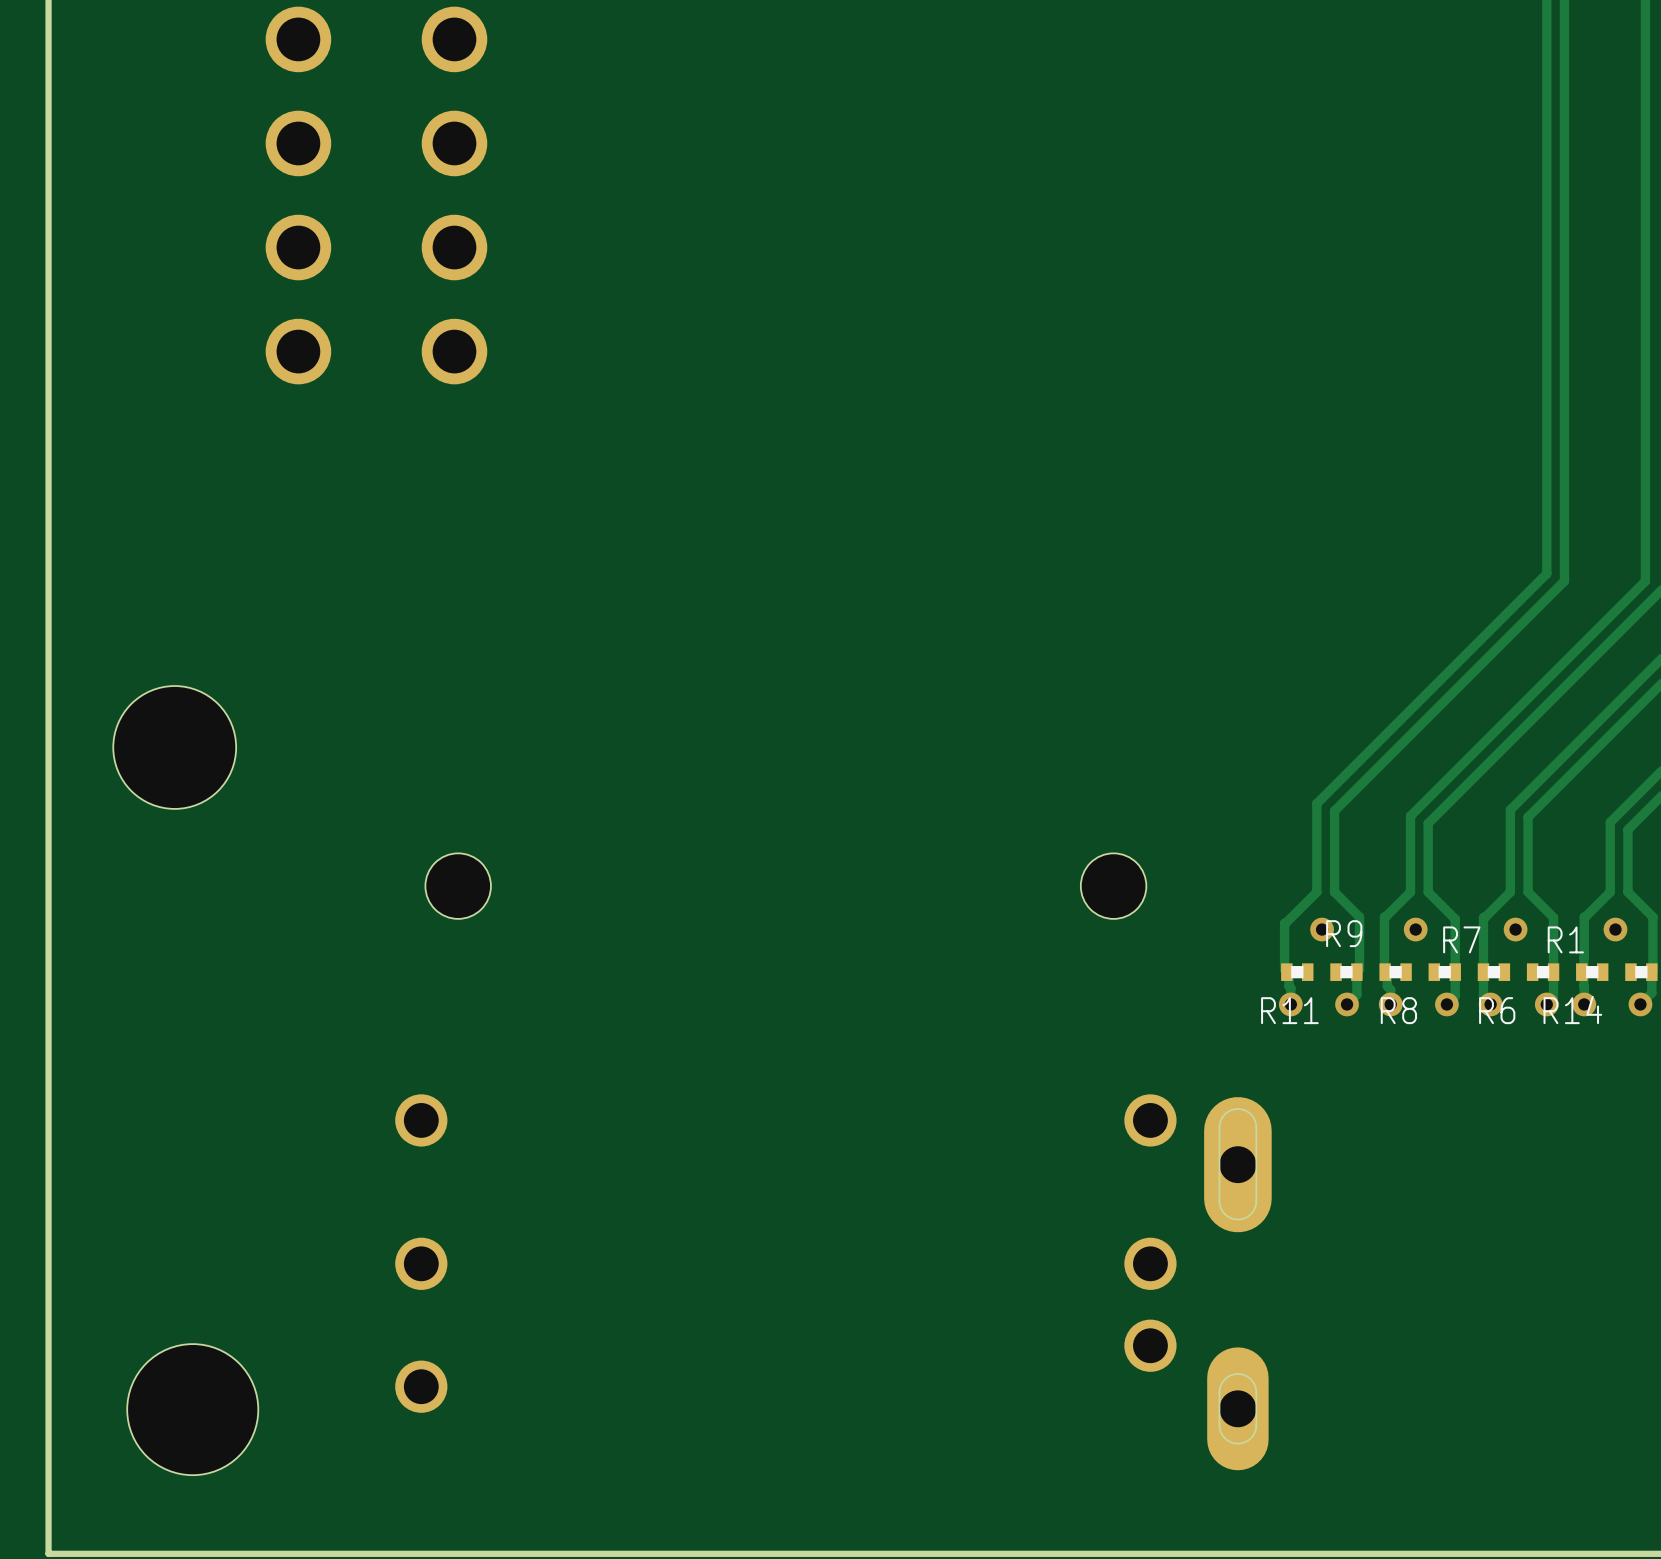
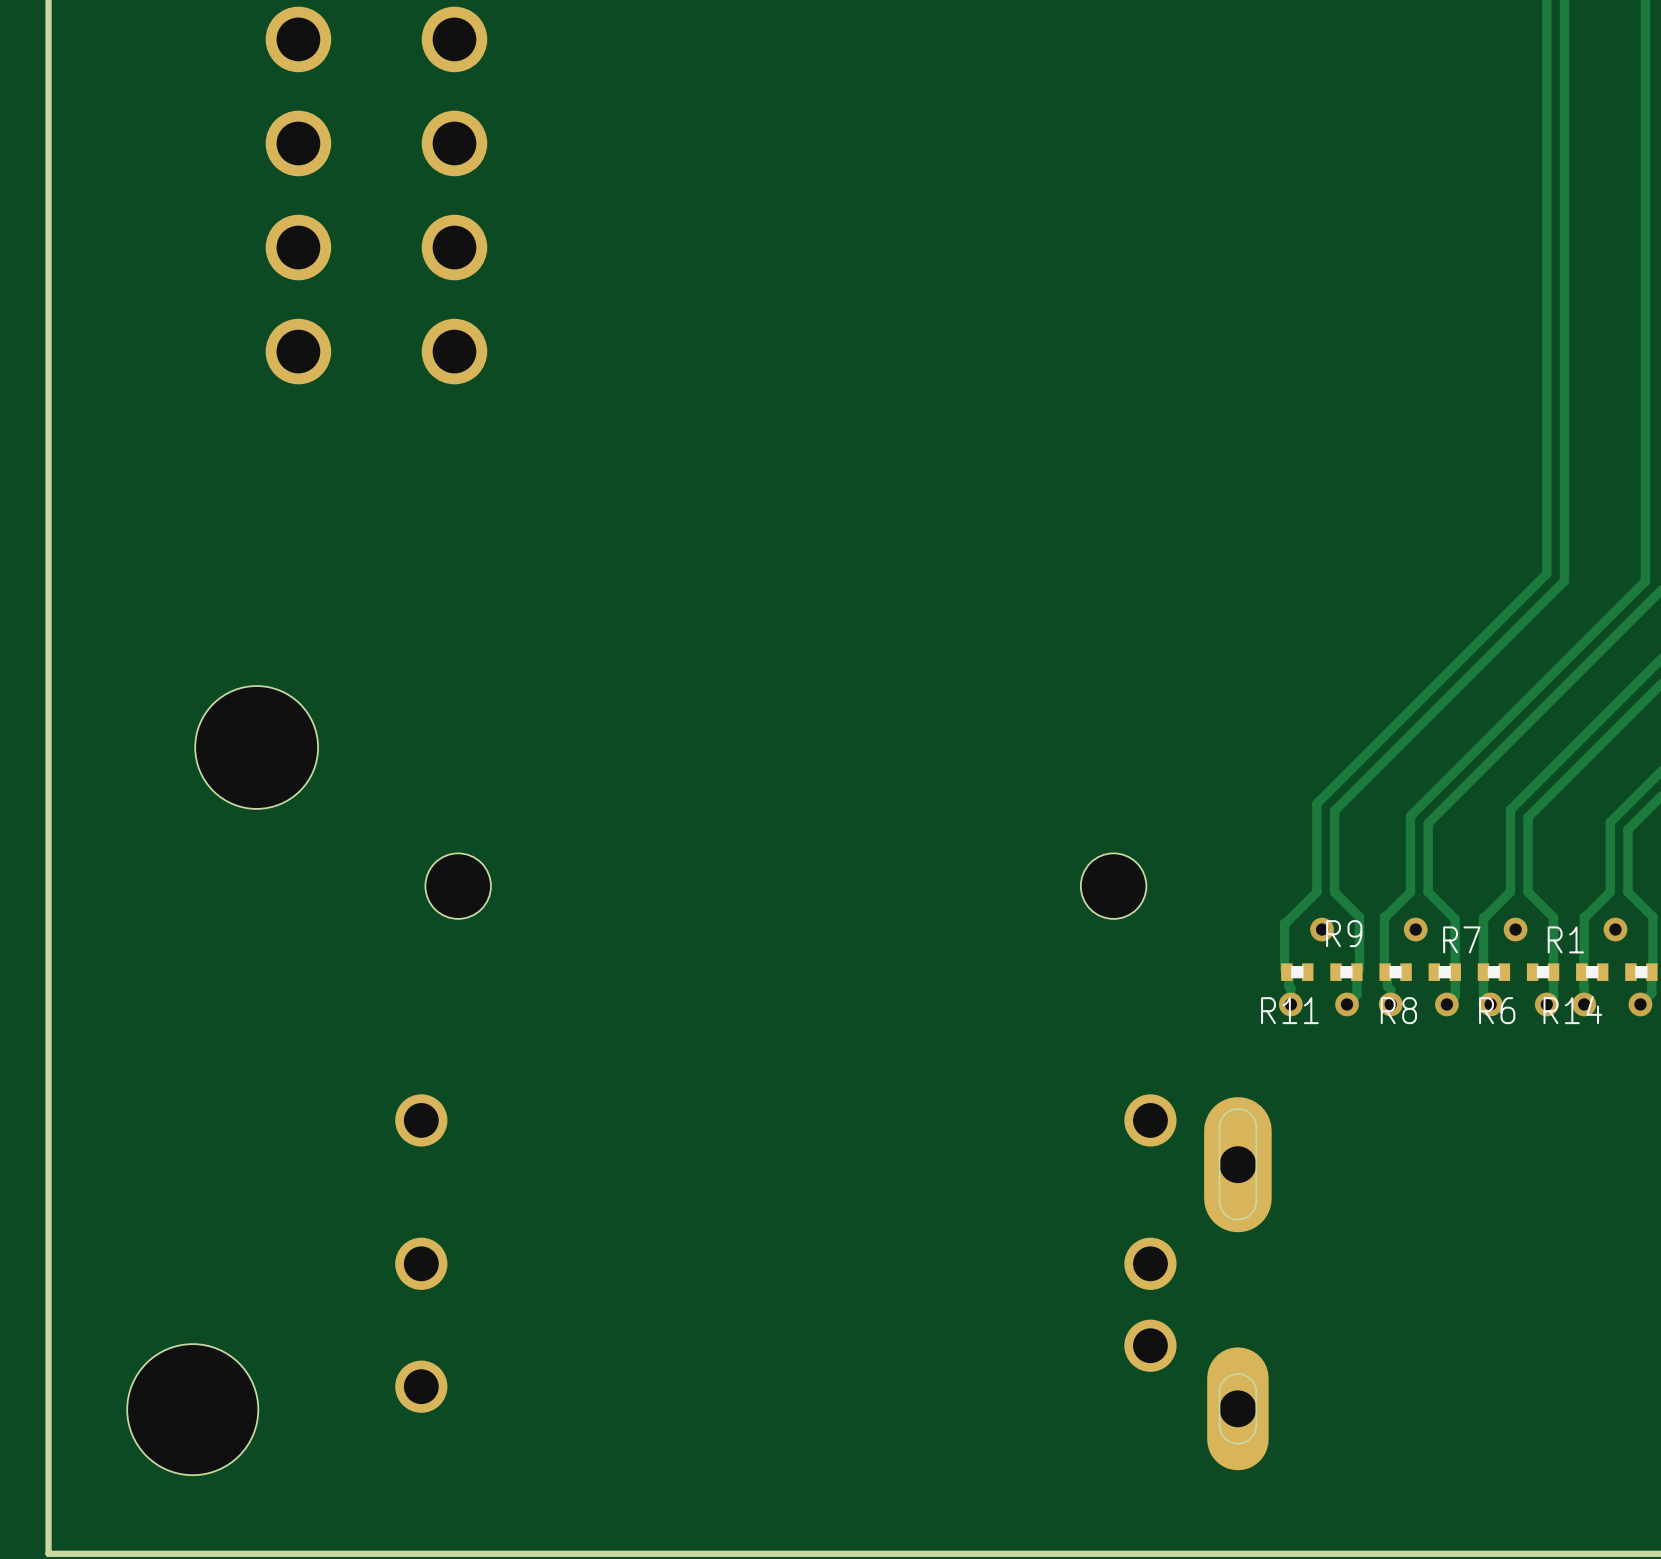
hole position: (174, 747) -> (256, 747)

